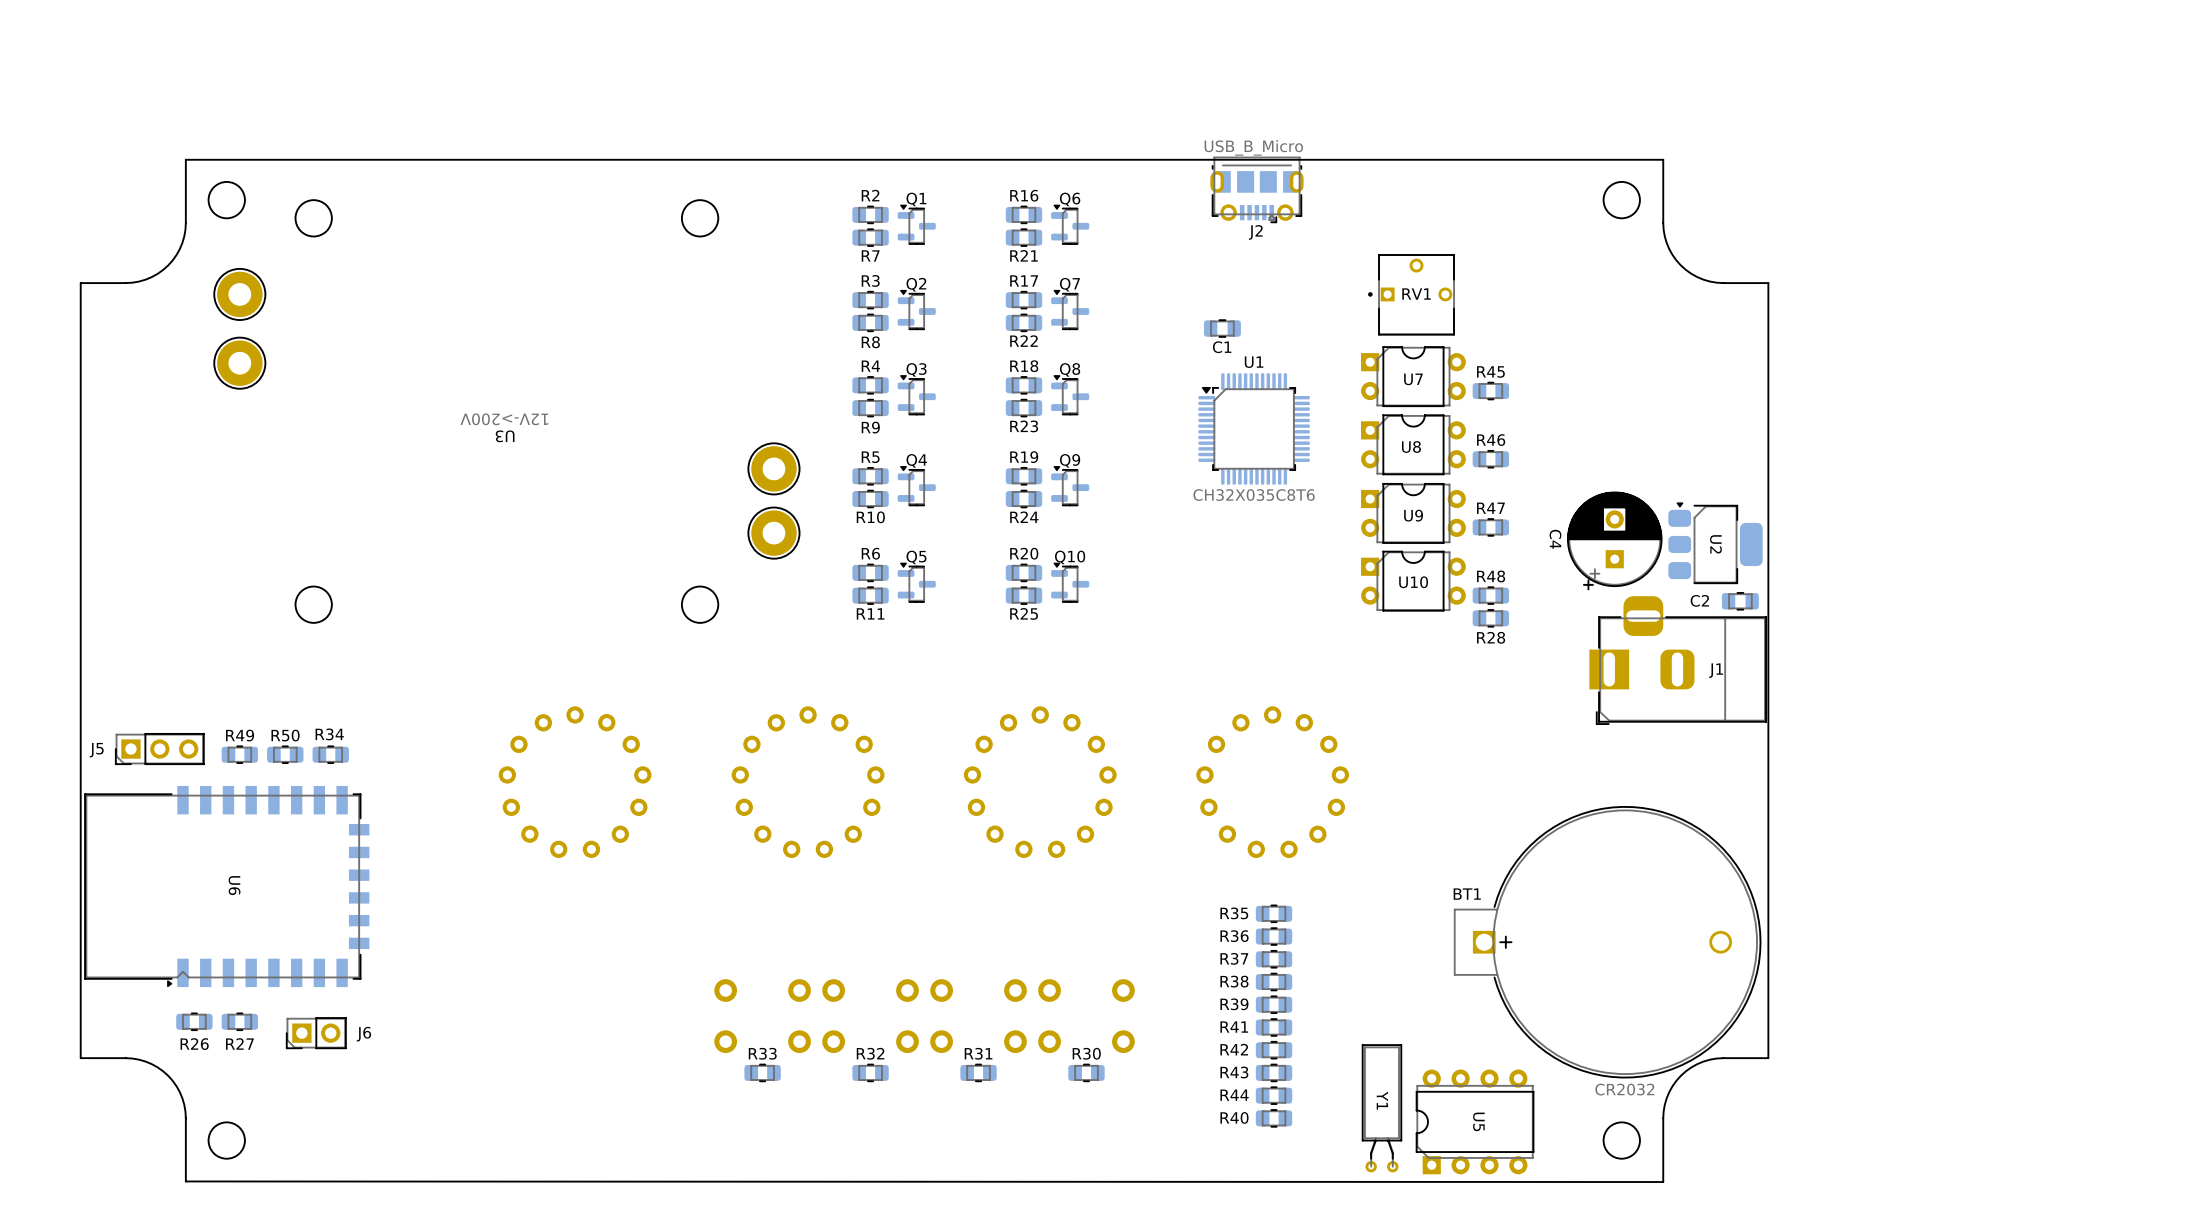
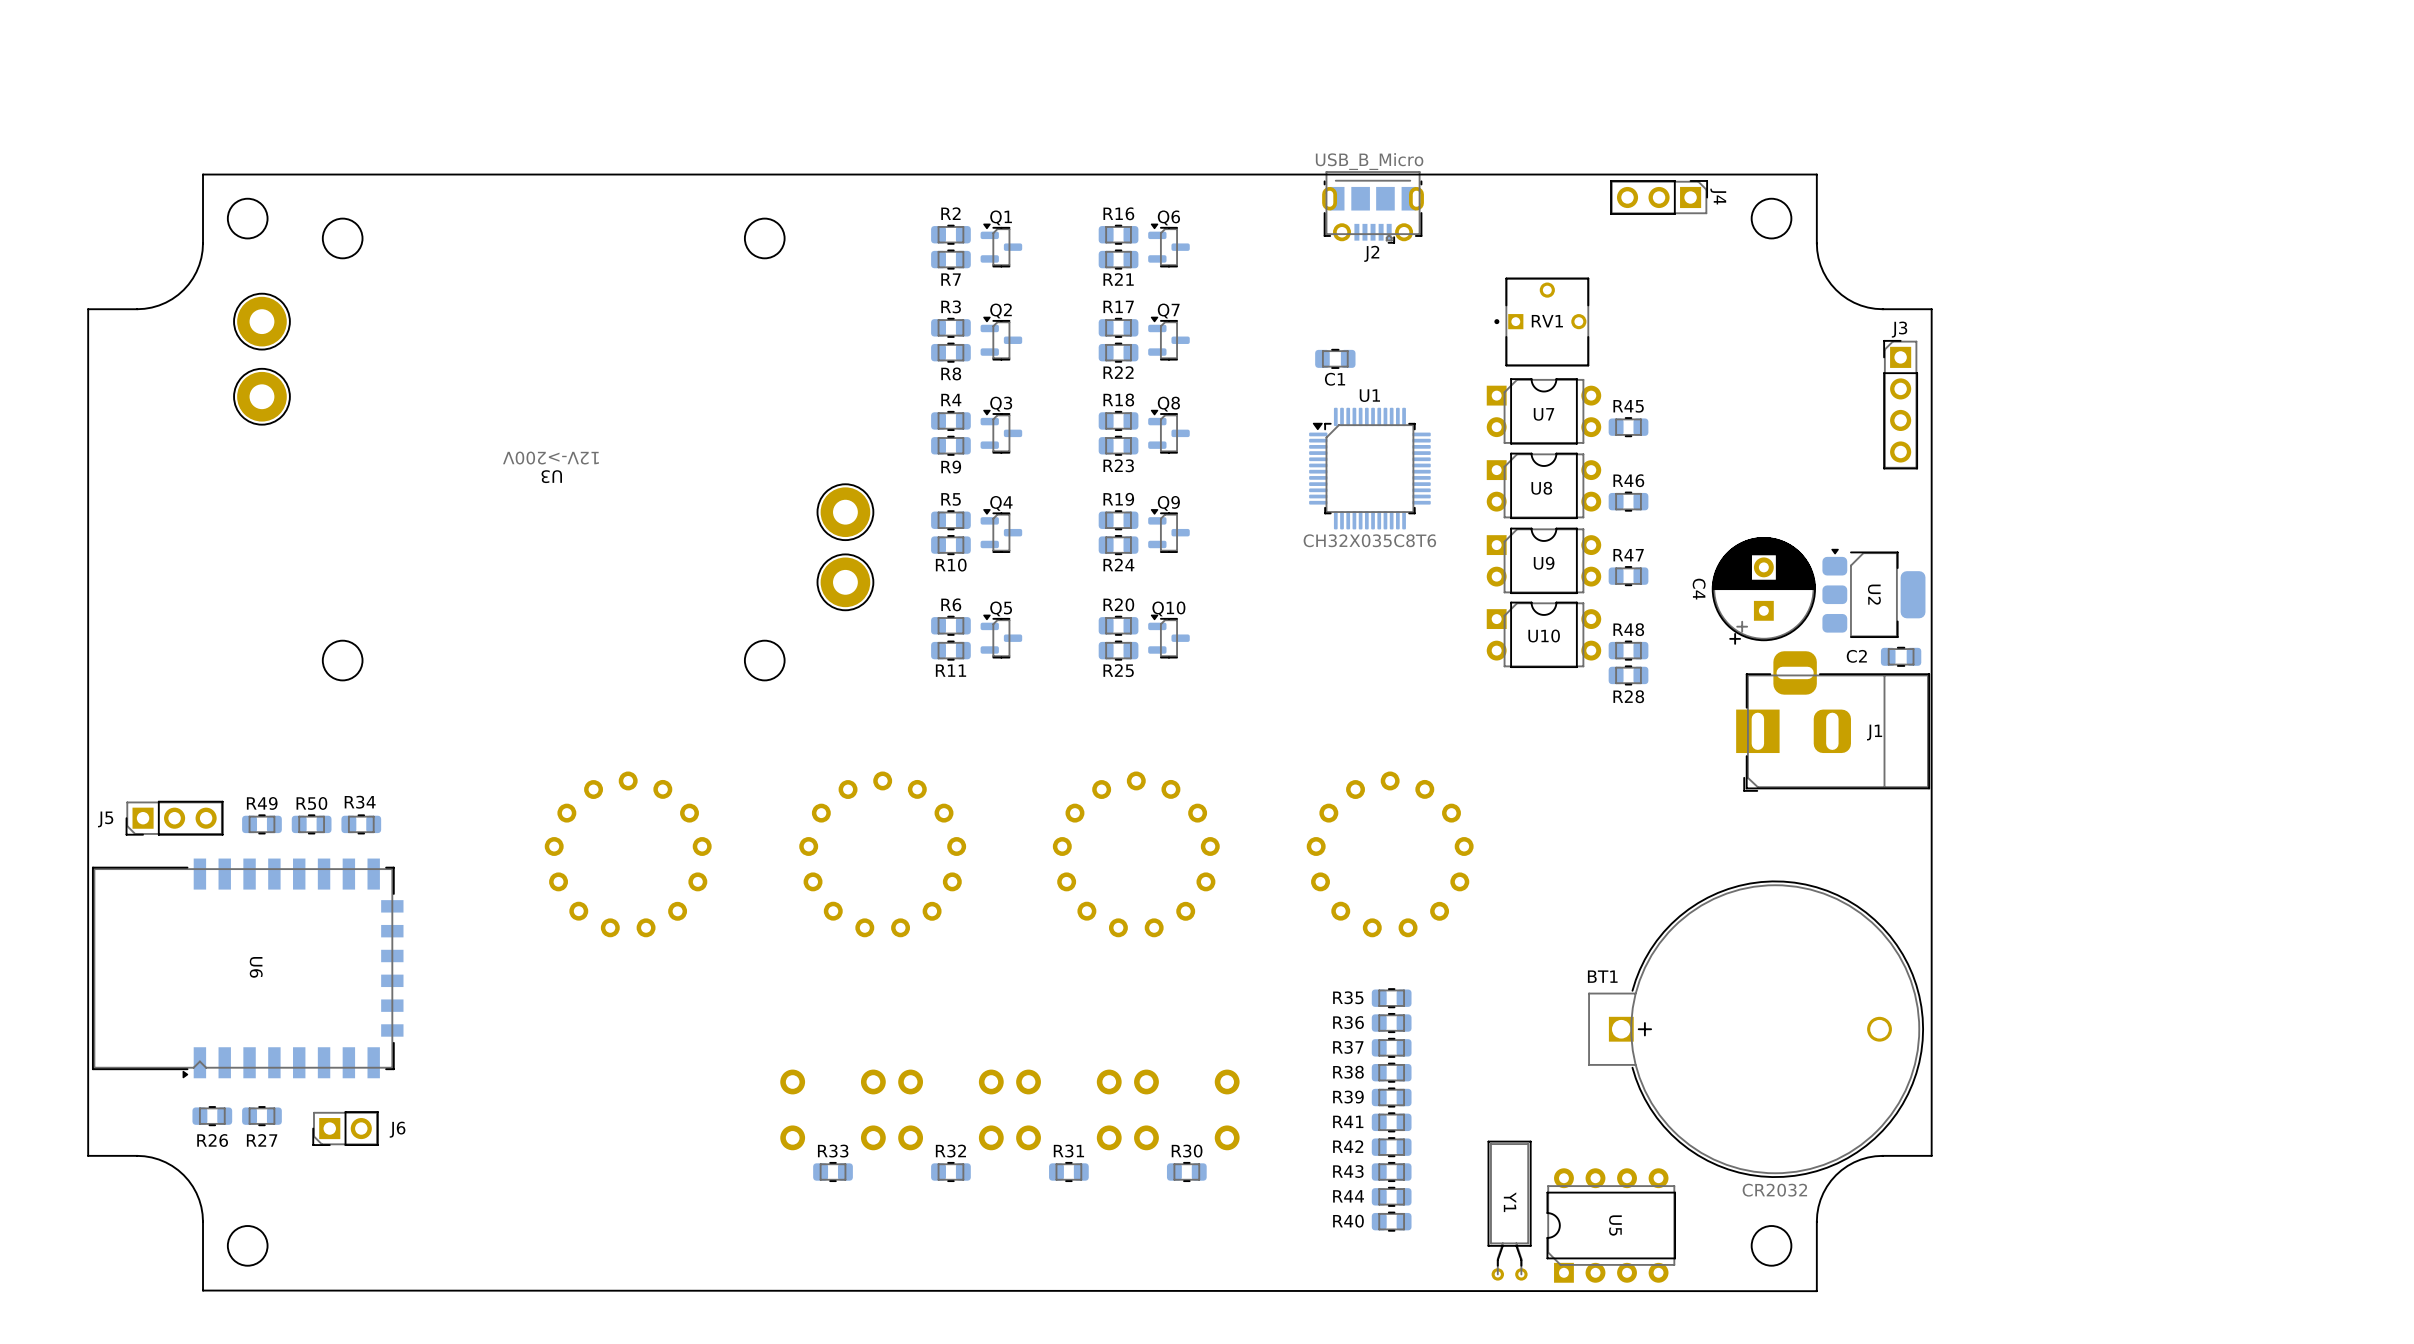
J4: none -> (1659, 197)
J3: none -> (1900, 404)

